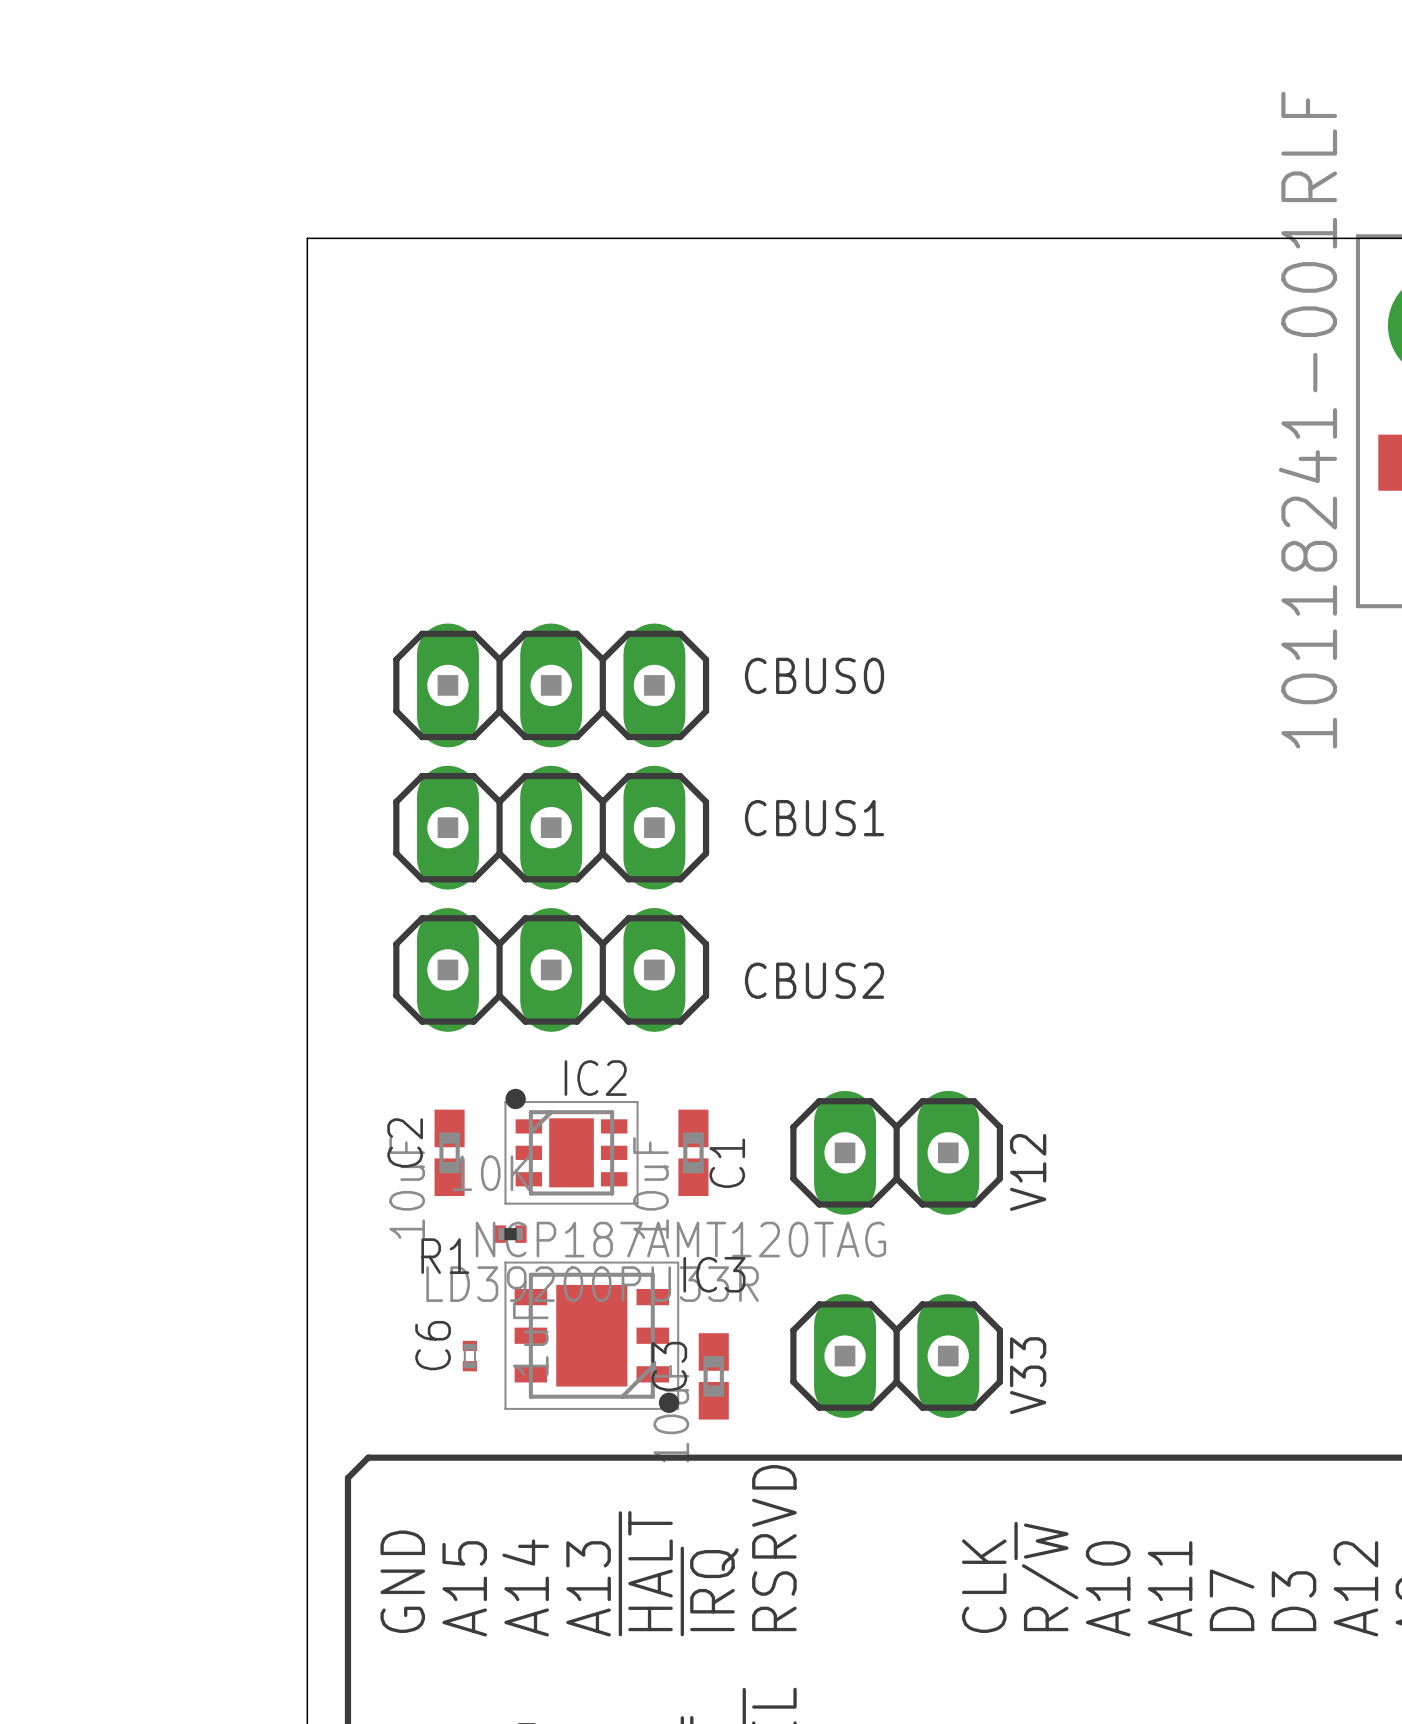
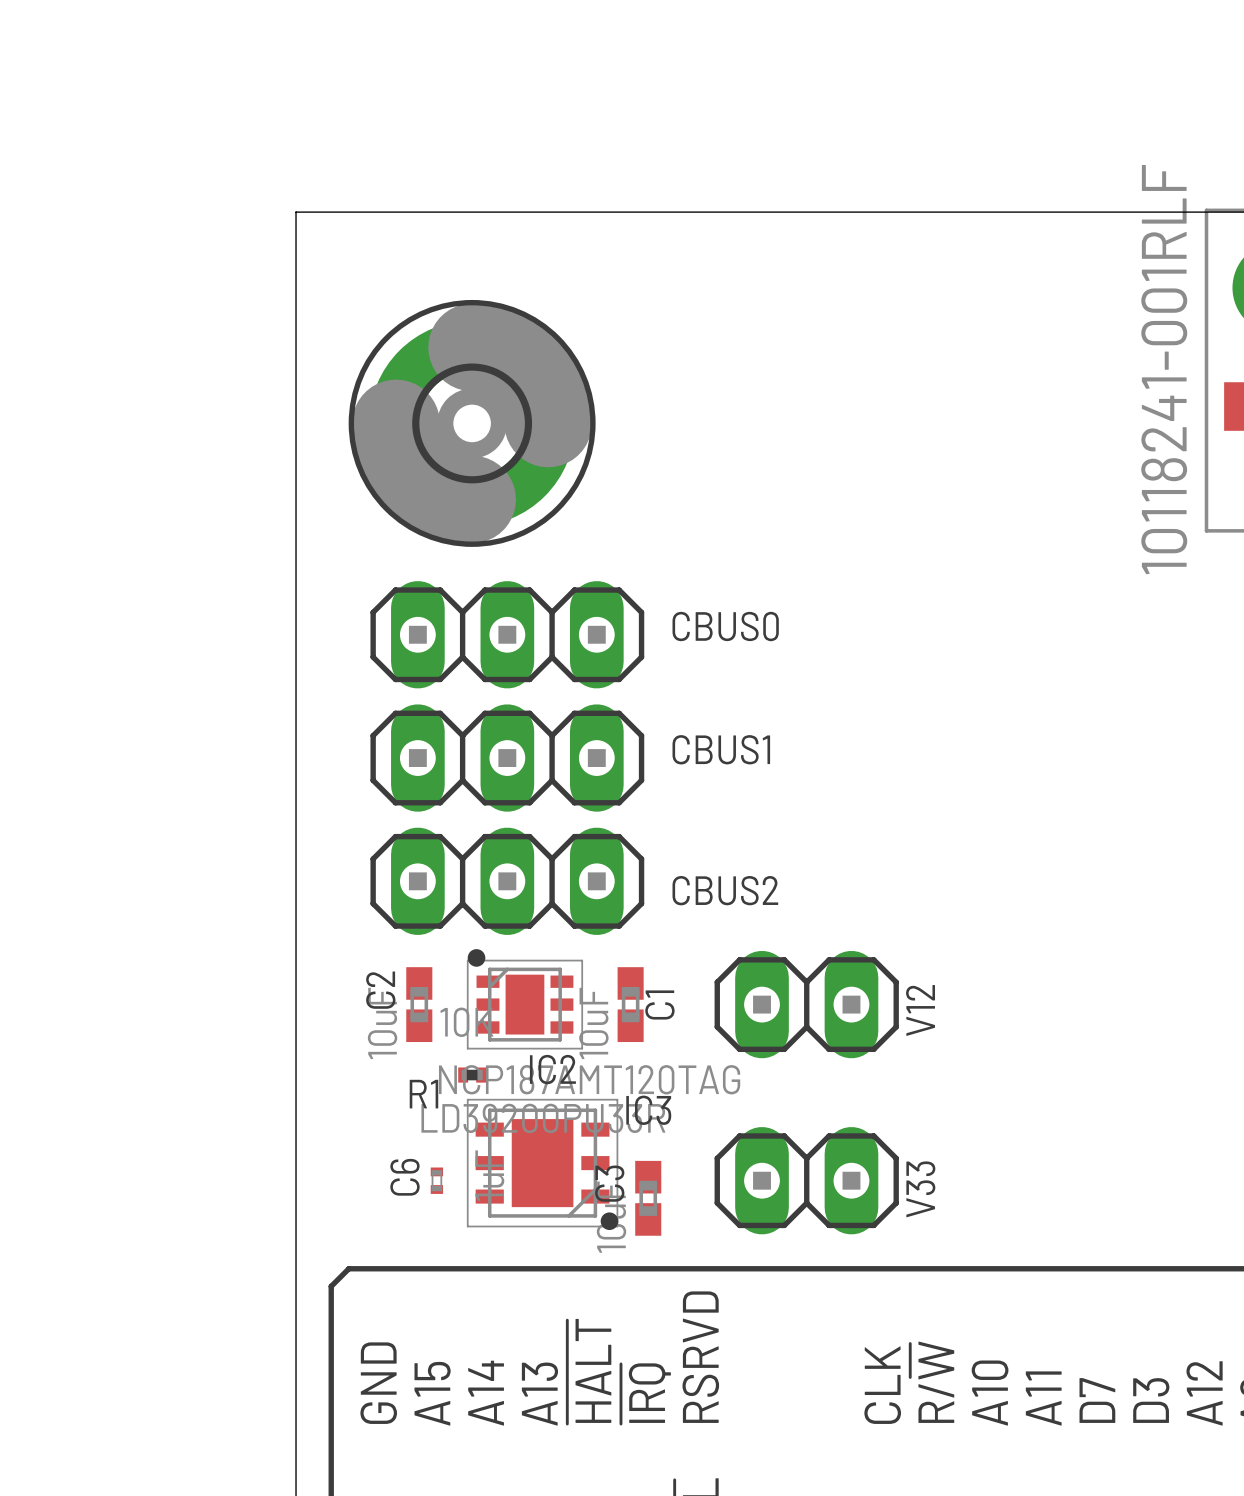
part: none -> (472, 423)
CBUS0 position: (551, 685) -> (507, 634)
CBUS1 position: (551, 827) -> (507, 758)
CBUS2 position: (551, 969) -> (507, 881)
IC2 name position: IC2 (595, 1078) -> IC2 (552, 1069)

